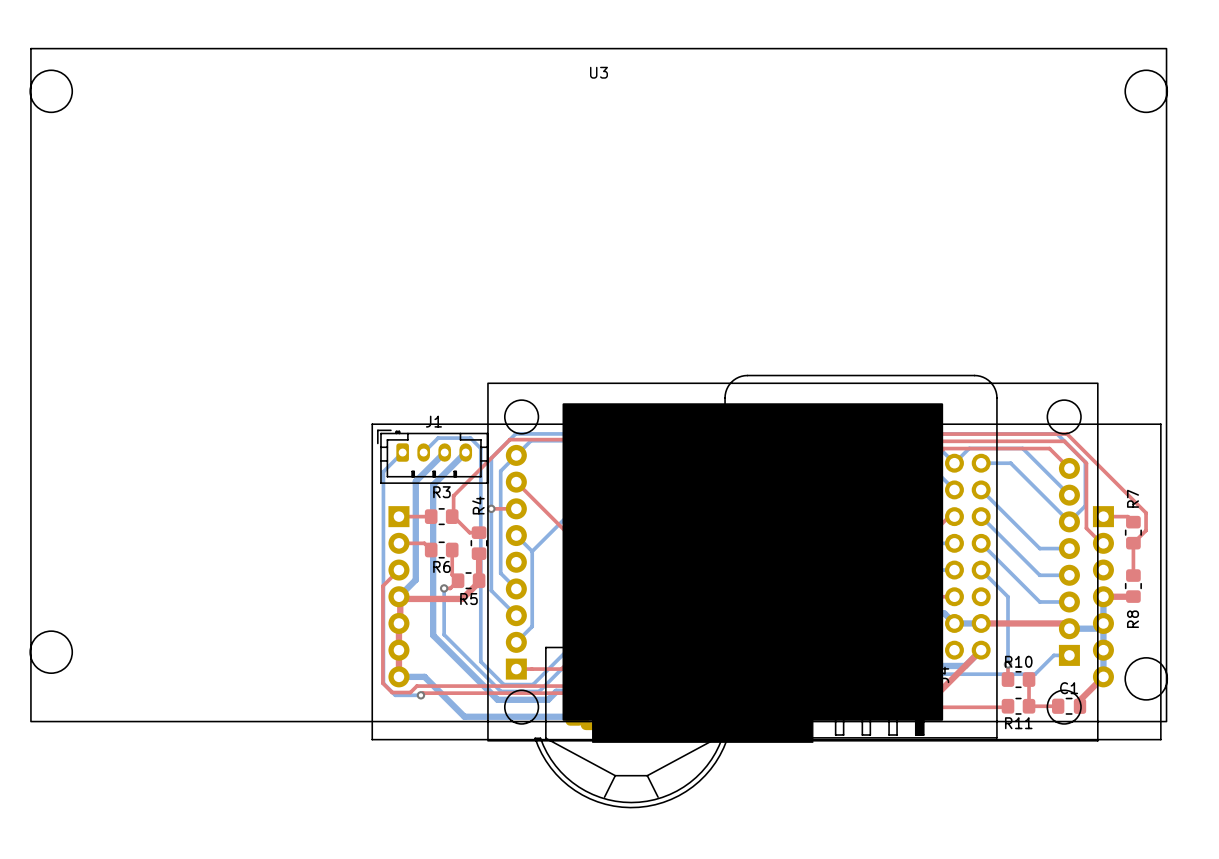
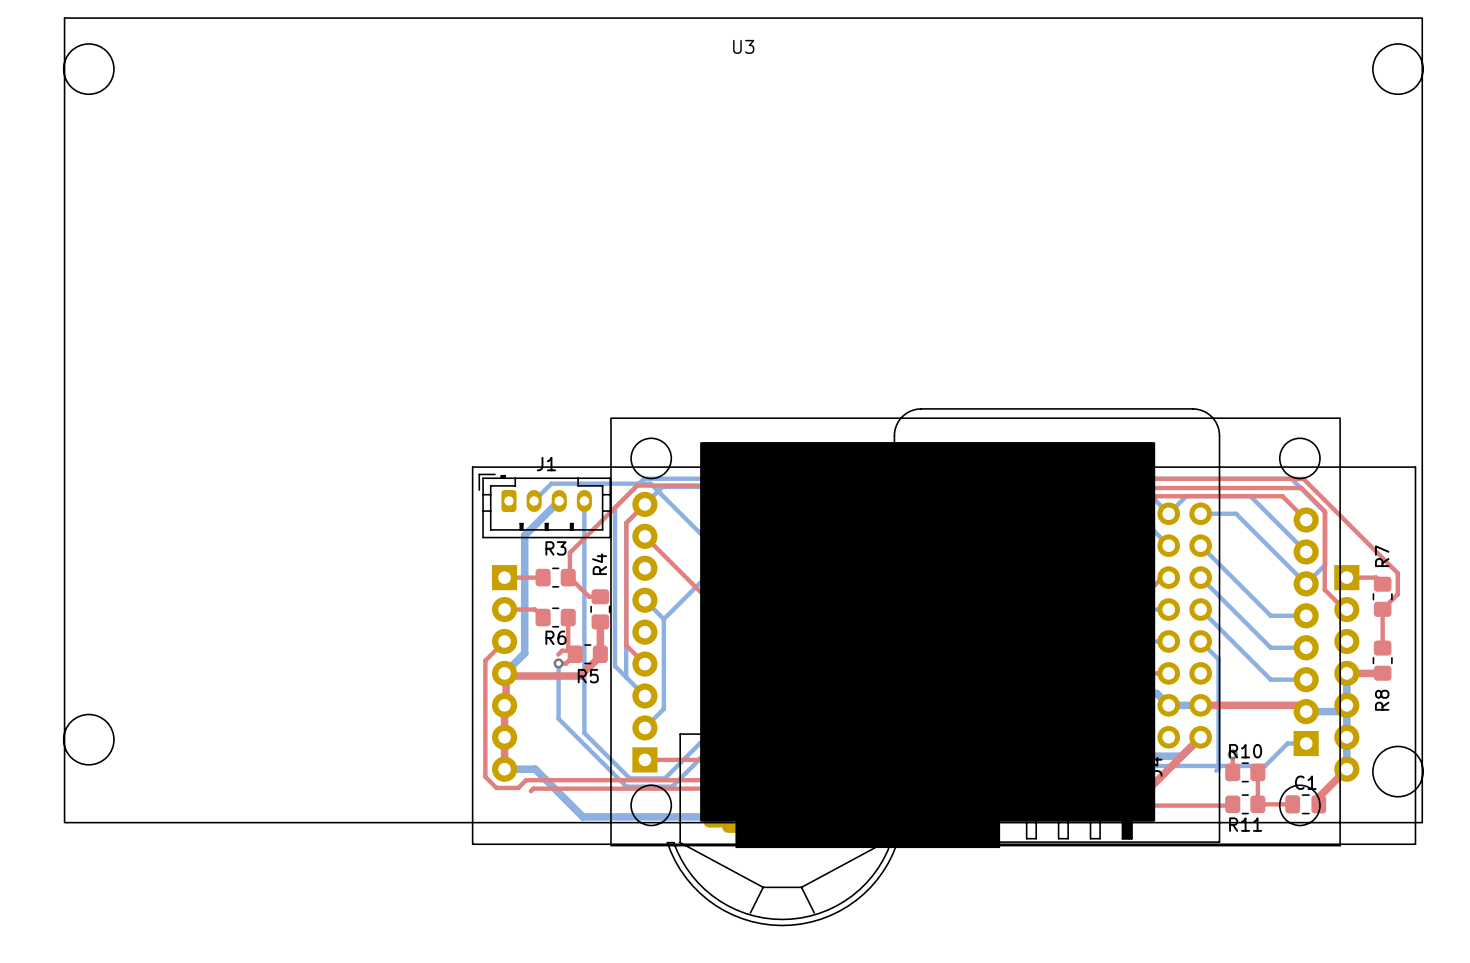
bottom track: (470, 438) (480, 448) (480, 661) -> (584, 500) (584, 733) (602, 750)
bottom track: none -> (590, 483) (650, 483) (703, 536) (703, 545)
bottom track: (402, 452) (383, 471) (383, 683) (395, 695) (420, 695) -> none
bottom track: (465, 452) (433, 485) (433, 635) (497, 699) (548, 699) (556, 691) (721, 691) (727, 697) -> none
top track: none -> (644, 504) (626, 523) (626, 645) (644, 664)
top track: (879, 465) (904, 441) (1064, 441) (1086, 463) (1086, 528) -> (961, 545) (1005, 545) (1063, 488) (1301, 488) (1324, 511) (1324, 589) (1326, 591)
top track: (491, 508) (516, 508) -> none
via: (491, 508) -> none
bottom track: (500, 573) (516, 588) -> (626, 645) (626, 677)
top track: none -> (571, 650) (562, 650) (558, 654)
bottom track: (996, 585) (1008, 596) (1008, 664) -> (1218, 659) (1218, 768) (1216, 770)
via: (420, 695) -> none

